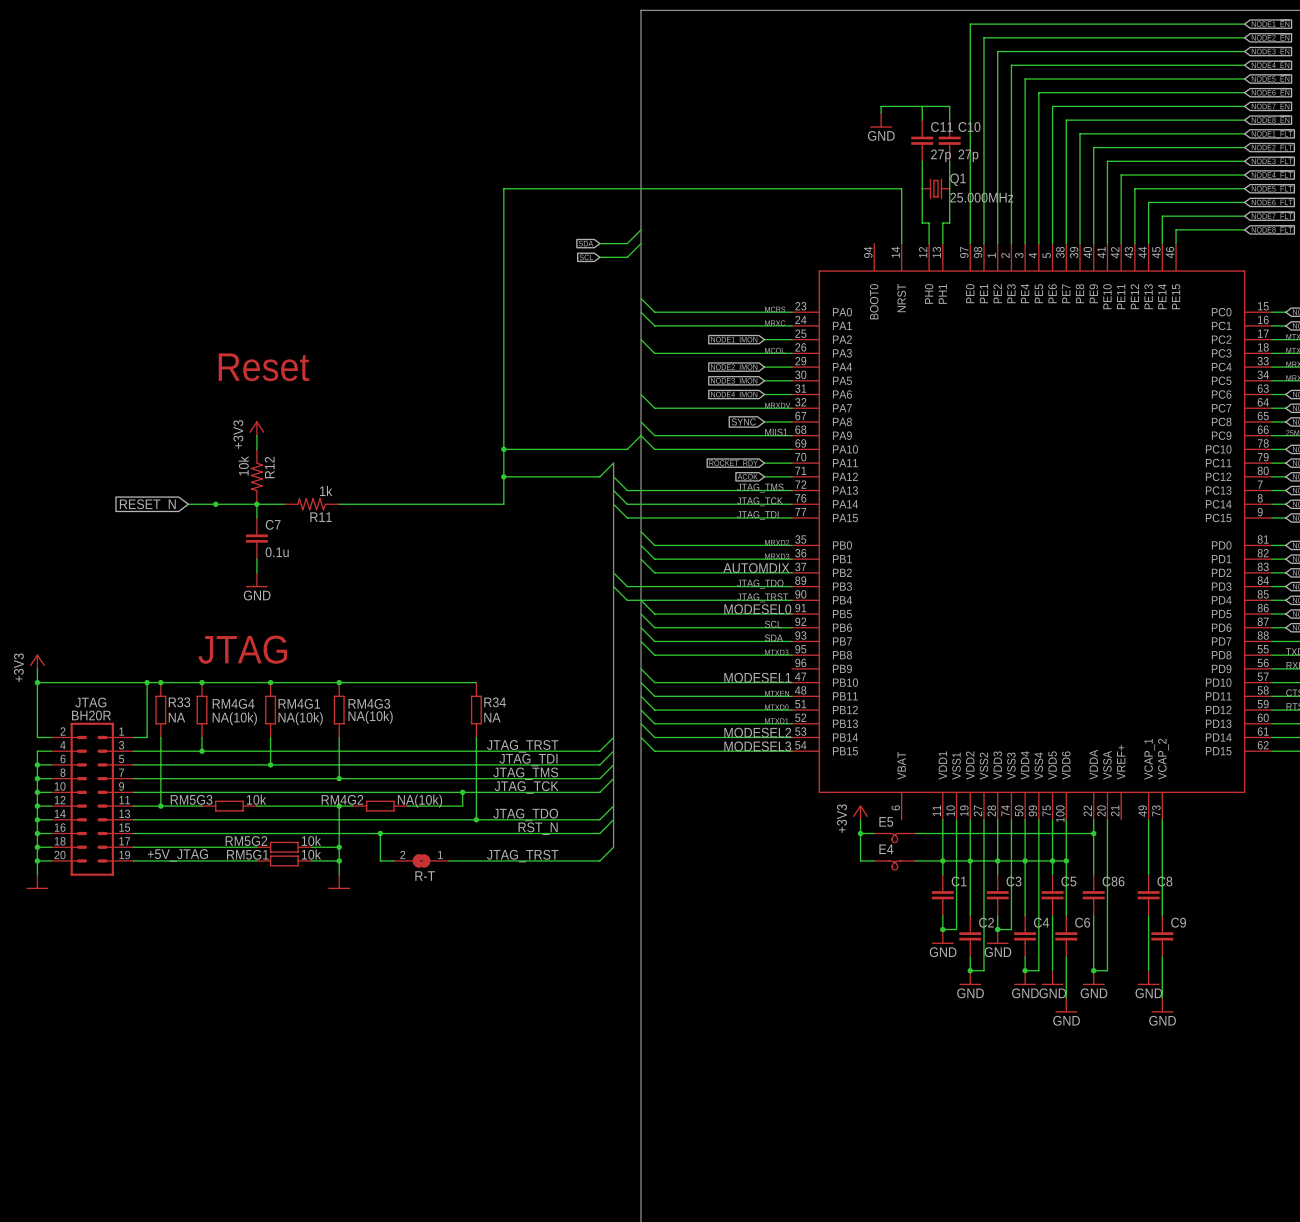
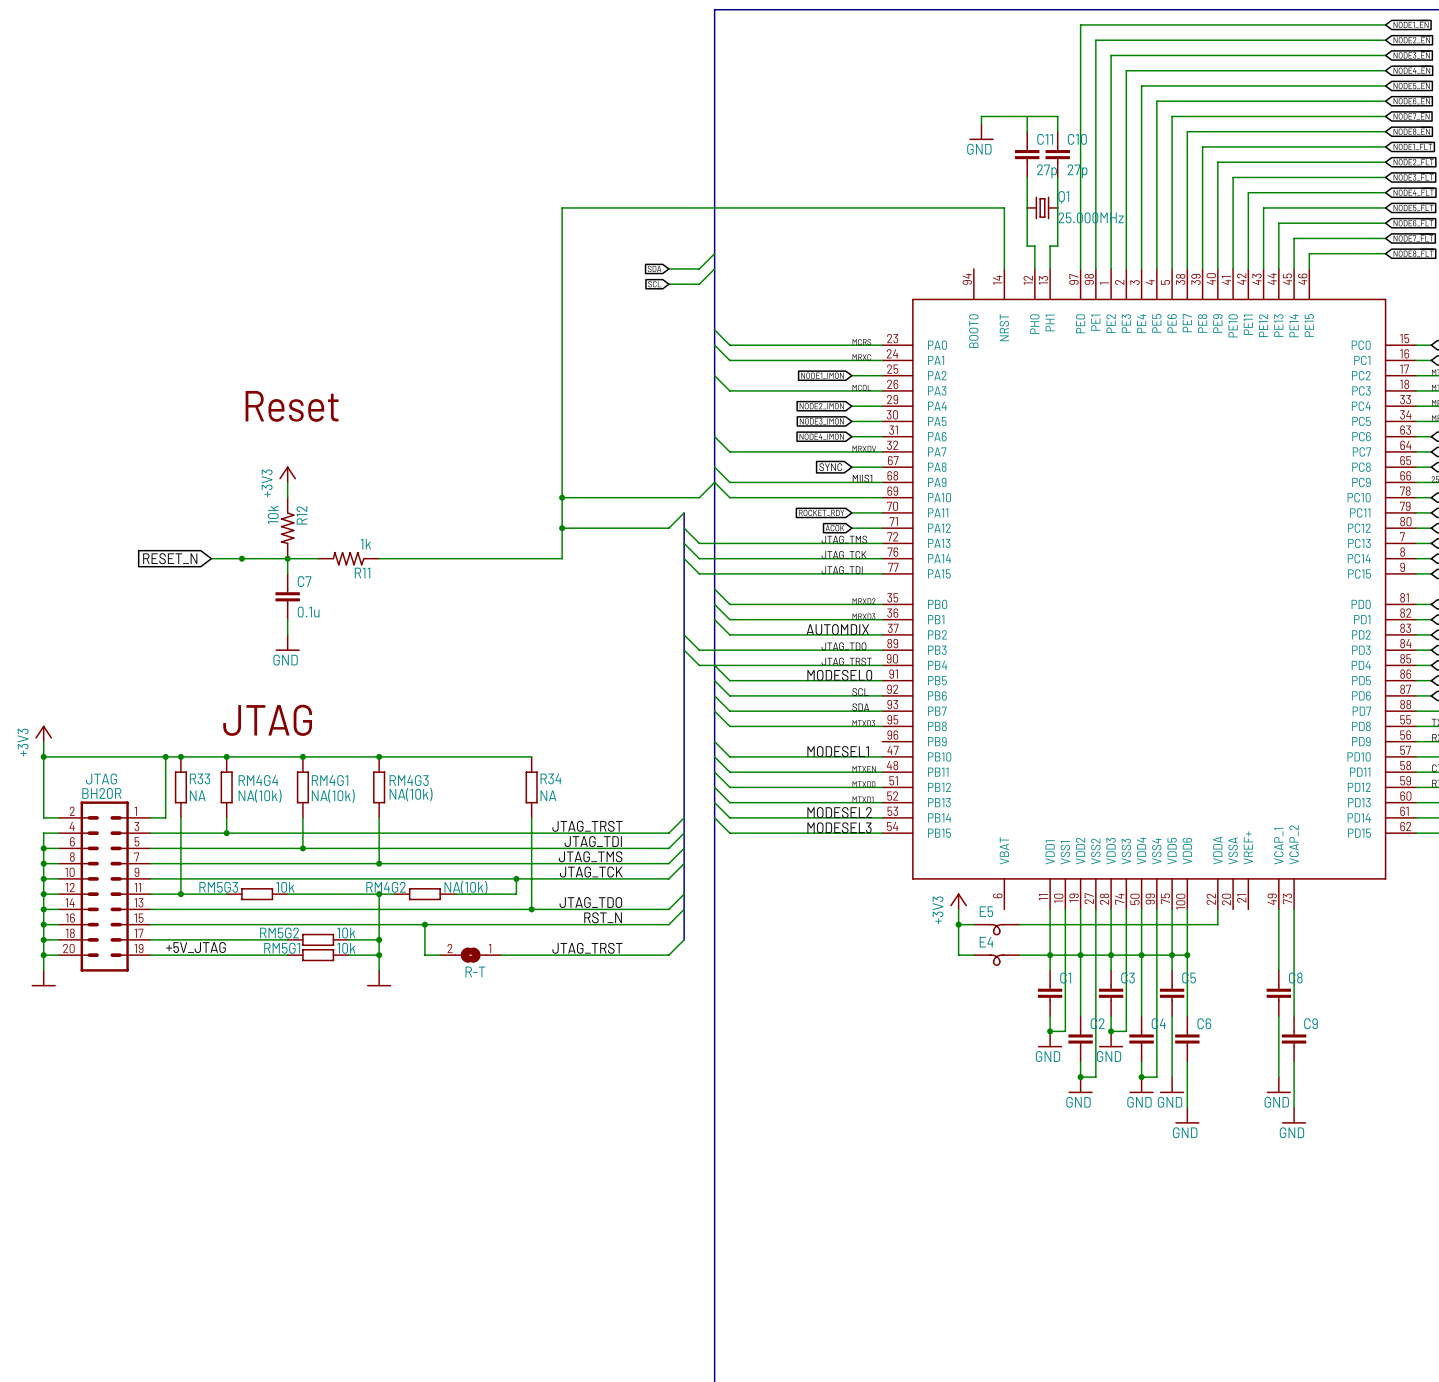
wire: (1107, 819) (1107, 970) (1093, 970) (1093, 915) -> none
wire: (1093, 833) (1093, 874) -> none
junction: (1093, 833) -> none
C86: (1093, 895) -> none
junction: (1093, 970) -> none
power symbol: GND (1093, 977) -> none

